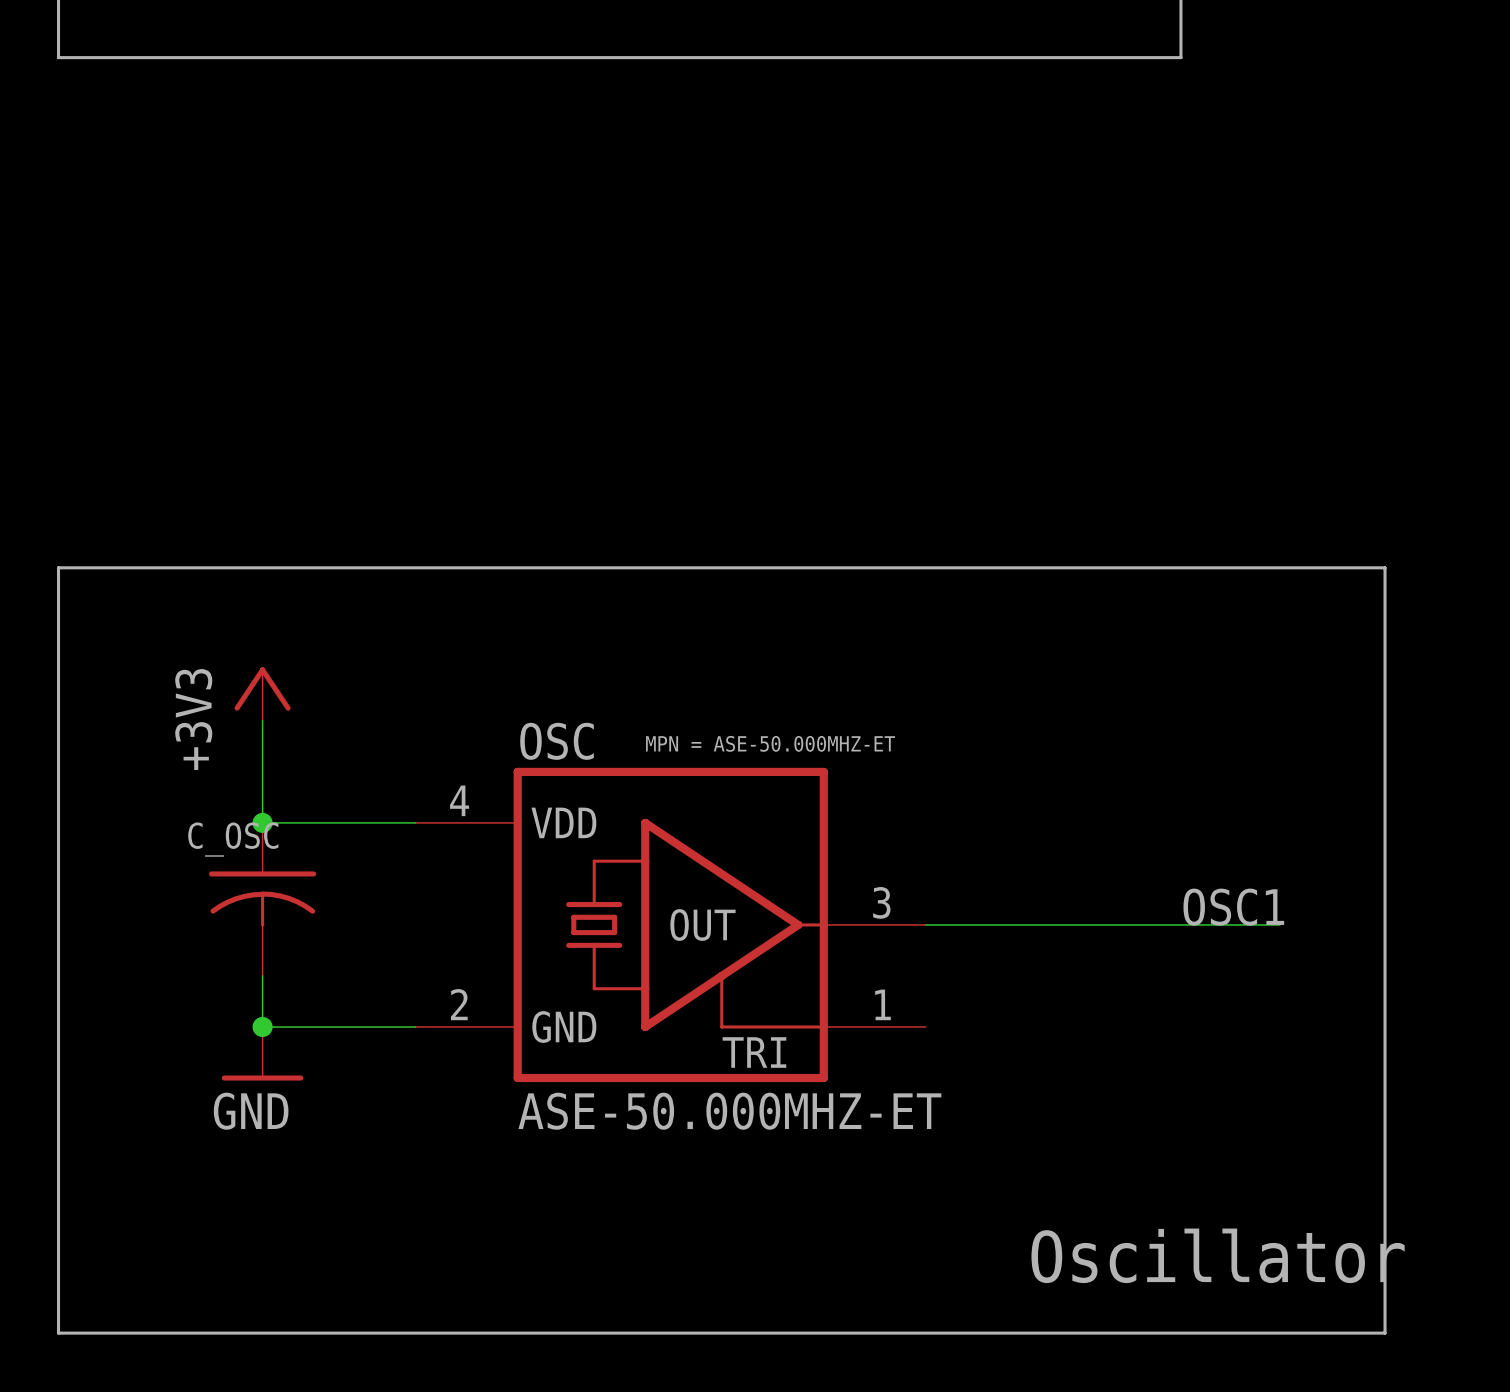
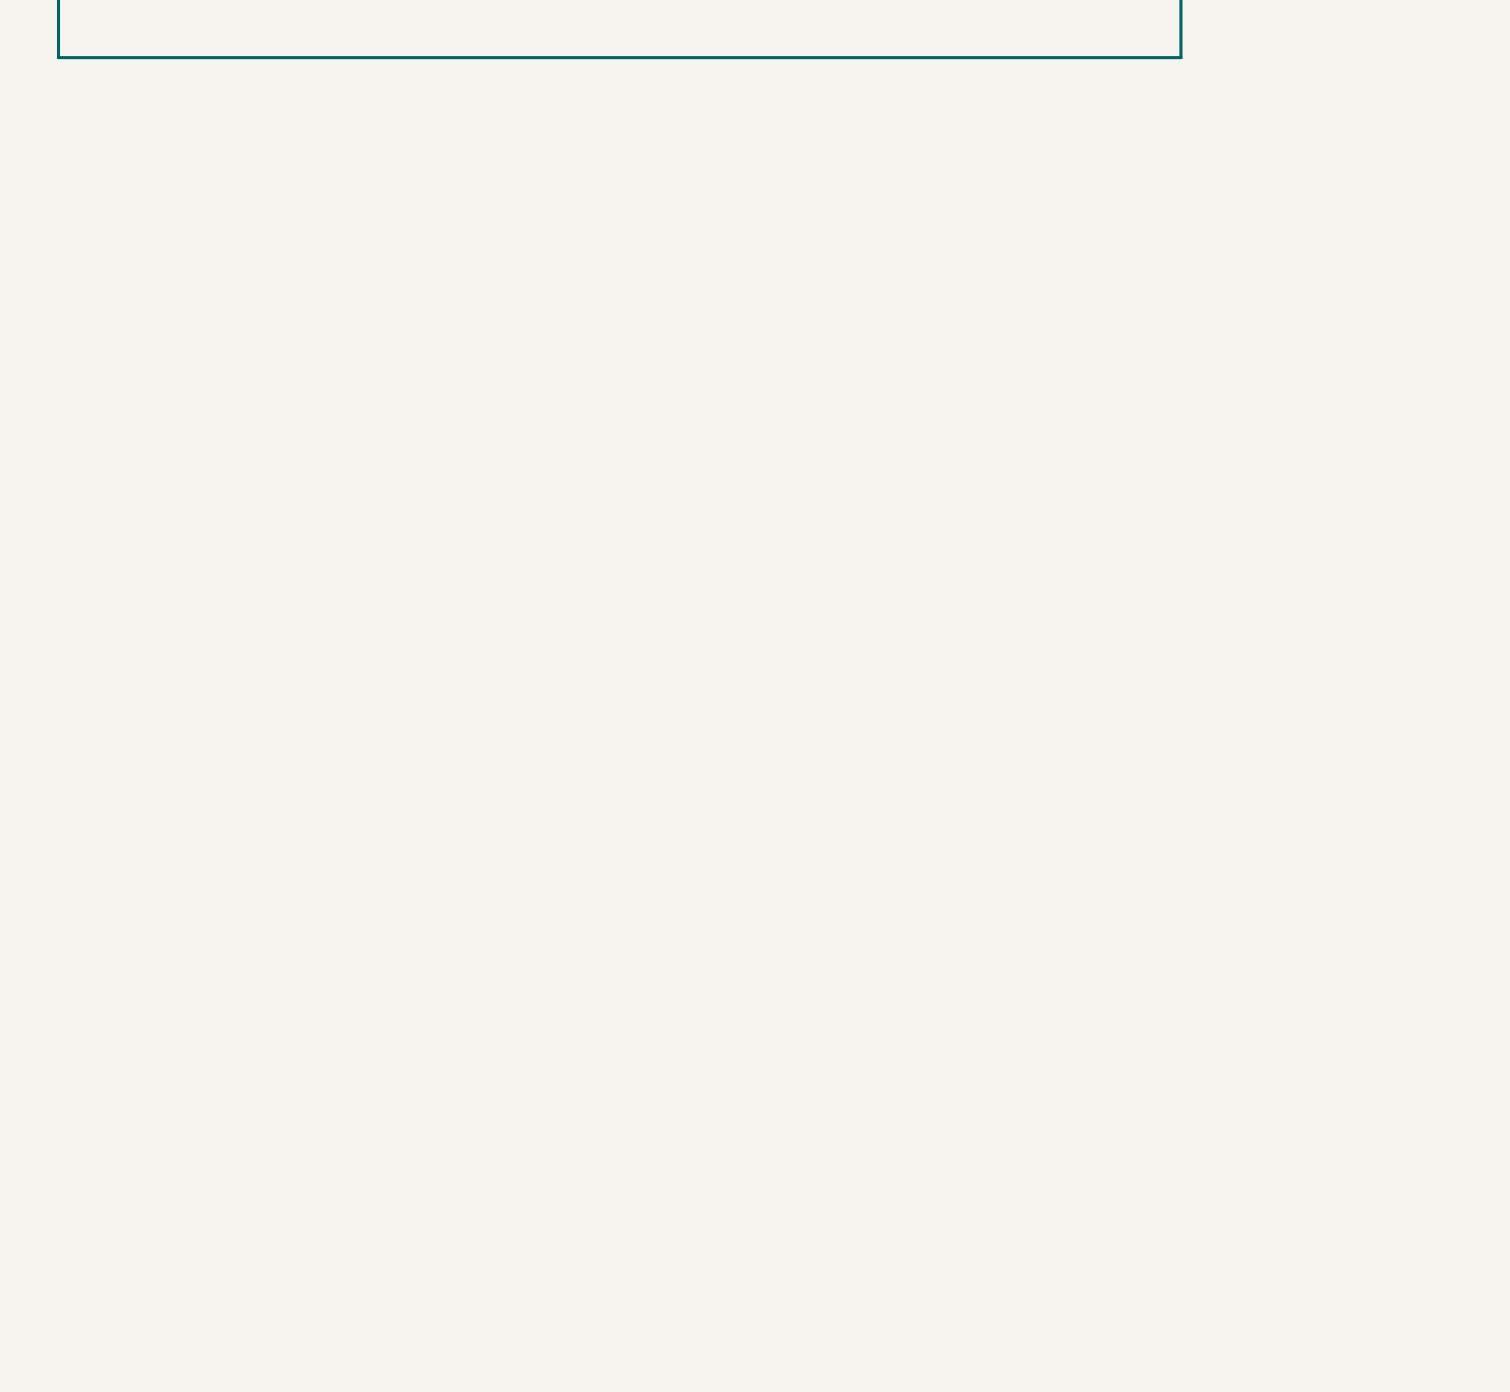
line: (58, 567) (58, 1333) (1385, 1333) (1385, 567) (58, 567) -> none
power symbol: +3V3 (262, 694) -> none
wire: (262, 720) (262, 822) (415, 822) -> none
junction: (262, 822) -> none
C_OSC: (262, 899) -> none
label: OSC1 (1233, 907) -> none
OSC: ASE-50.000MHZ-ET (670, 924) -> none
wire: (925, 924) (1279, 924) -> none
wire: (262, 975) (262, 1026) (415, 1026) -> none
junction: (262, 1026) -> none
power symbol: GND (262, 1053) -> none
text: Oscillator (1218, 1255) -> none

